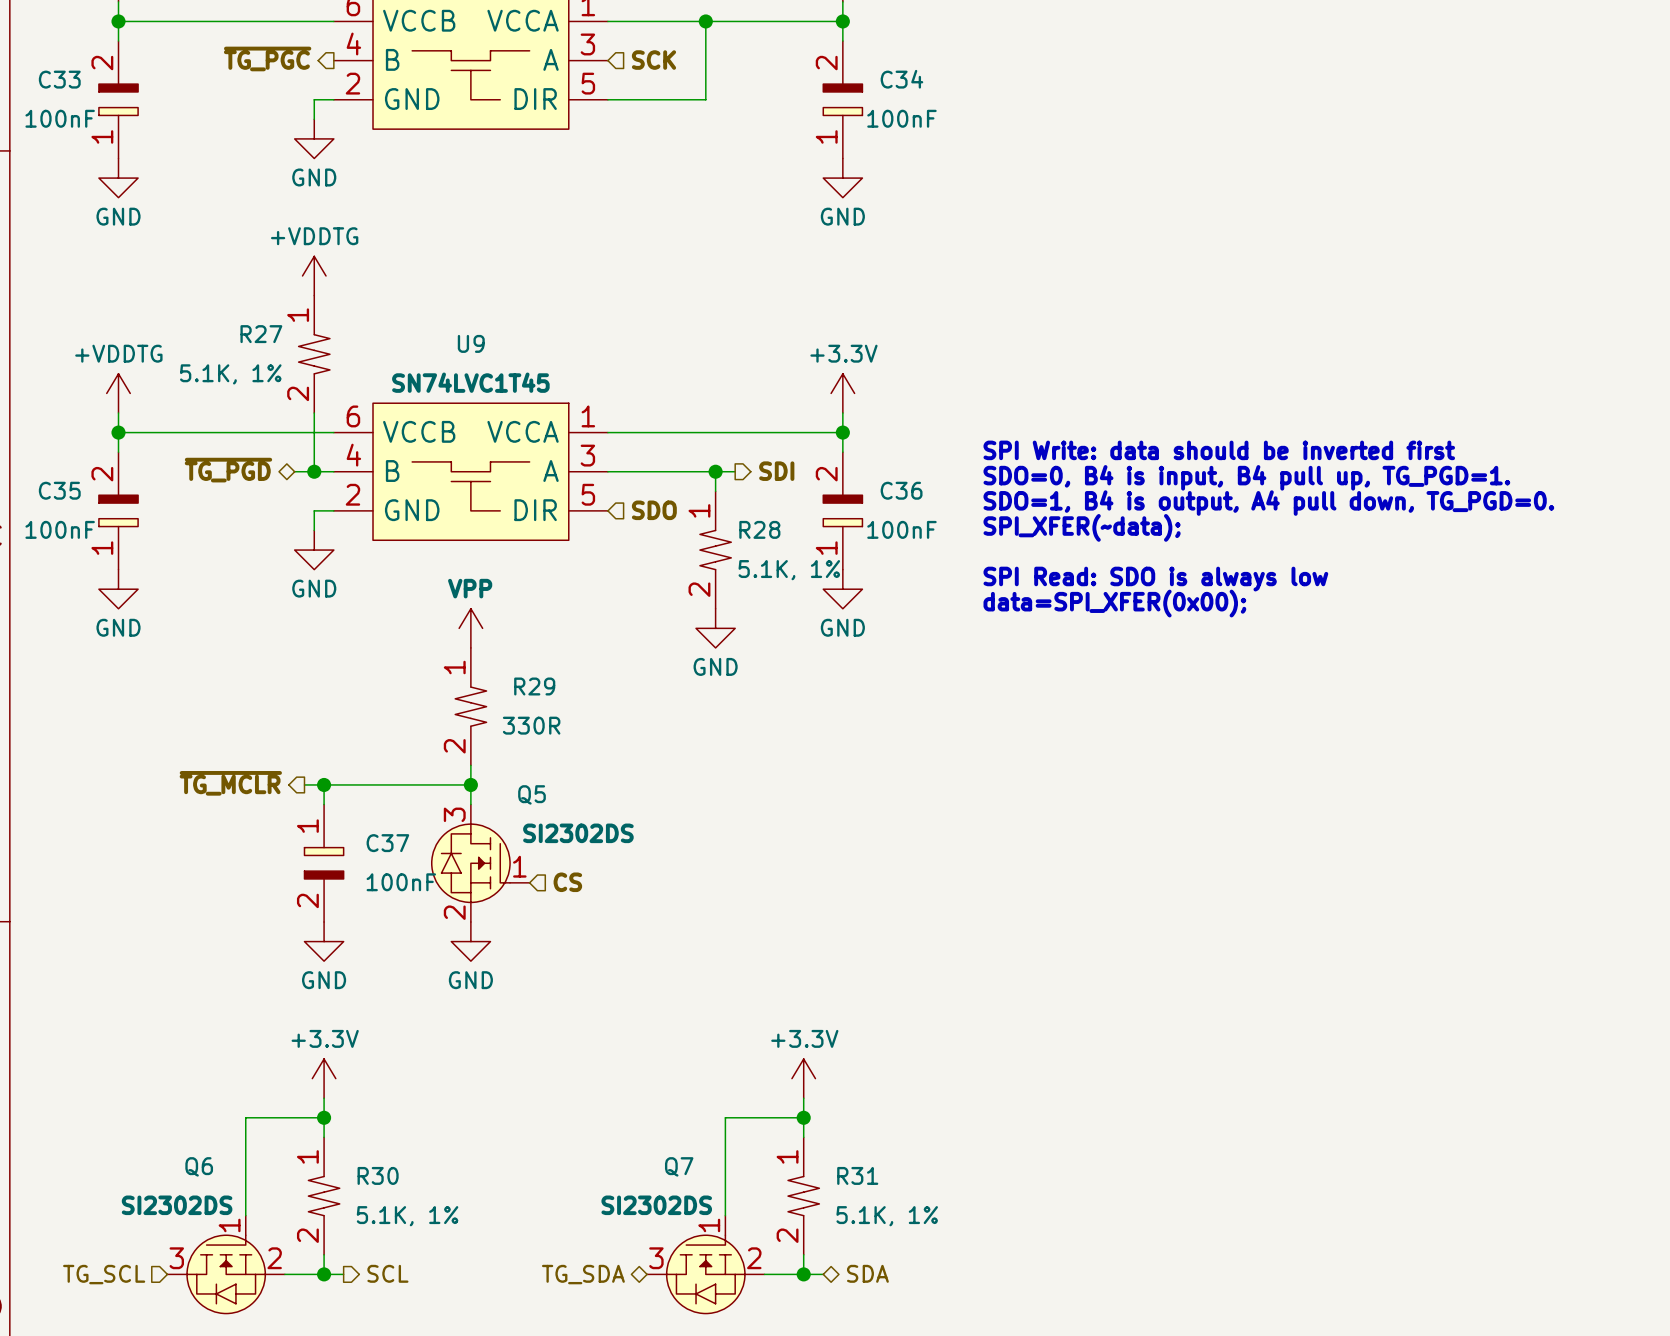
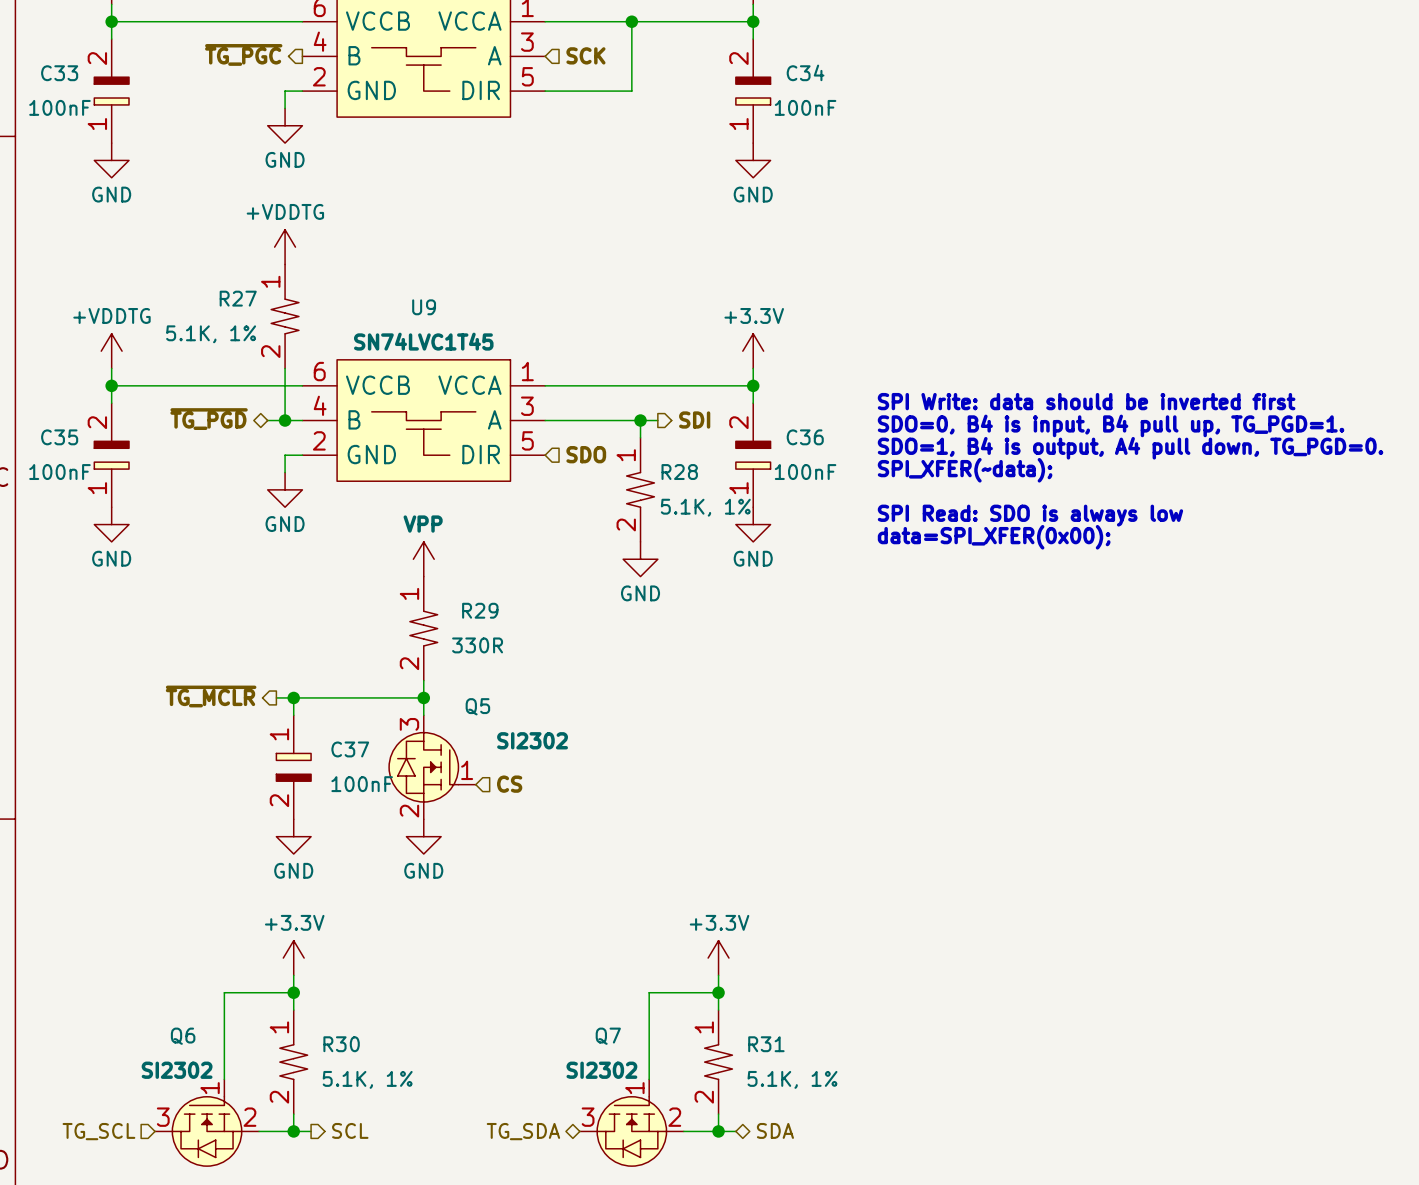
Q5 value: SI2302DS (578, 833) -> SI2302 (532, 740)
Q6 value: SI2302DS (177, 1205) -> SI2302 (177, 1070)
Q7 value: SI2302DS (656, 1205) -> SI2302 (601, 1070)

